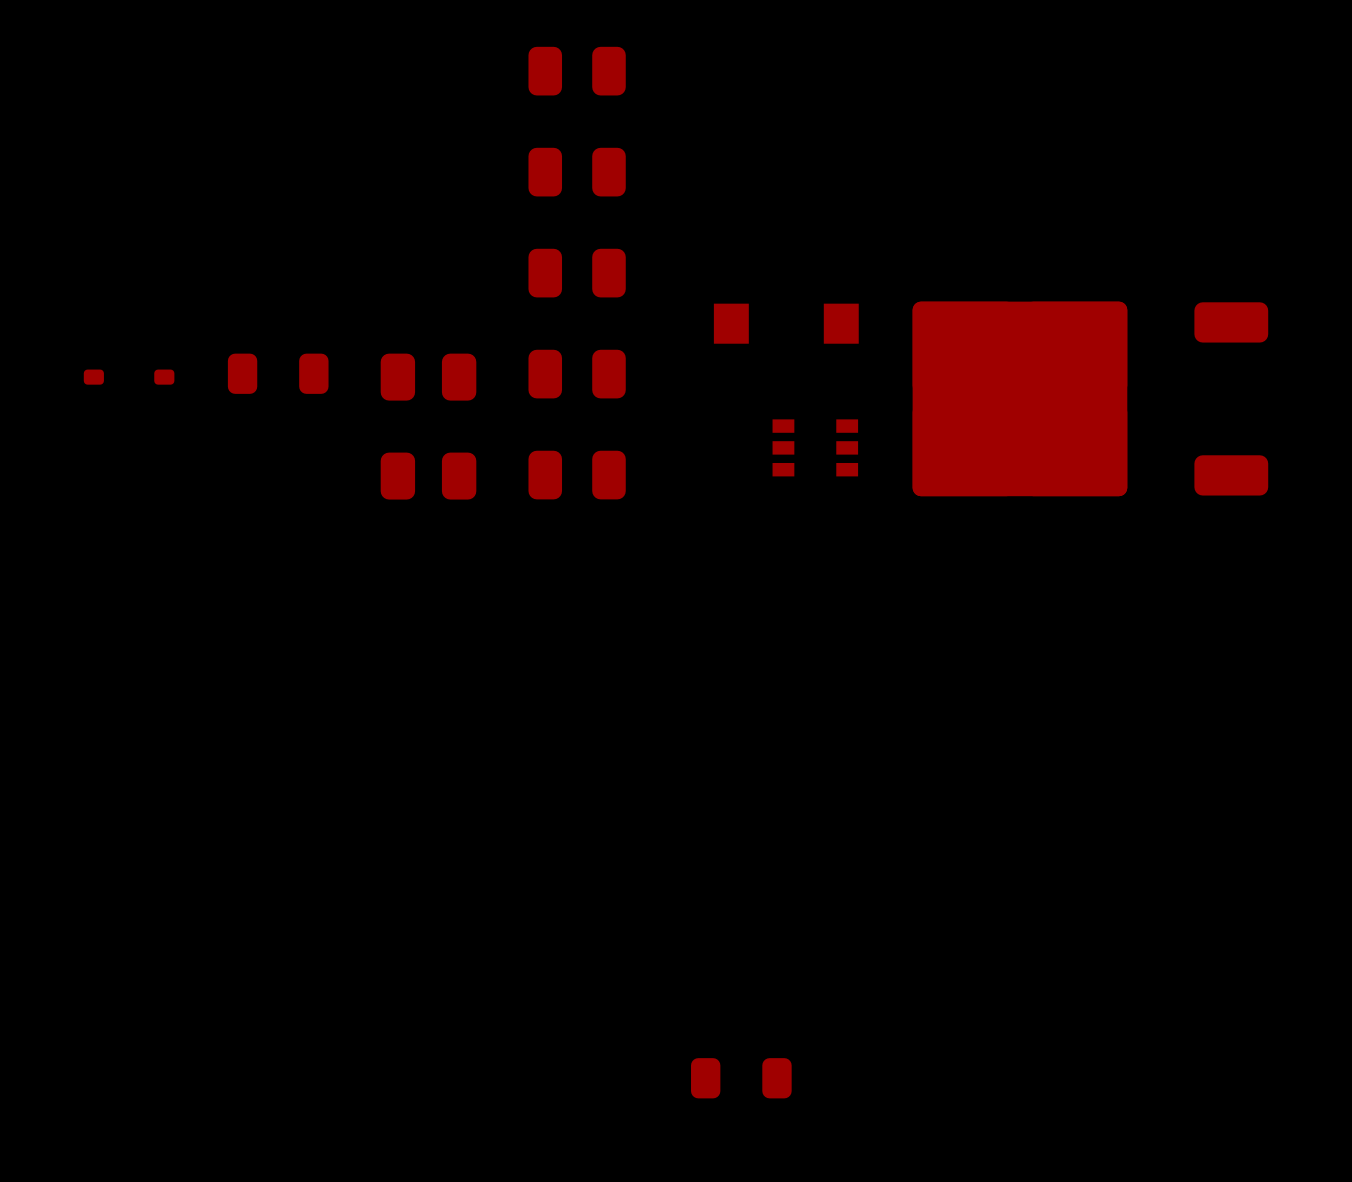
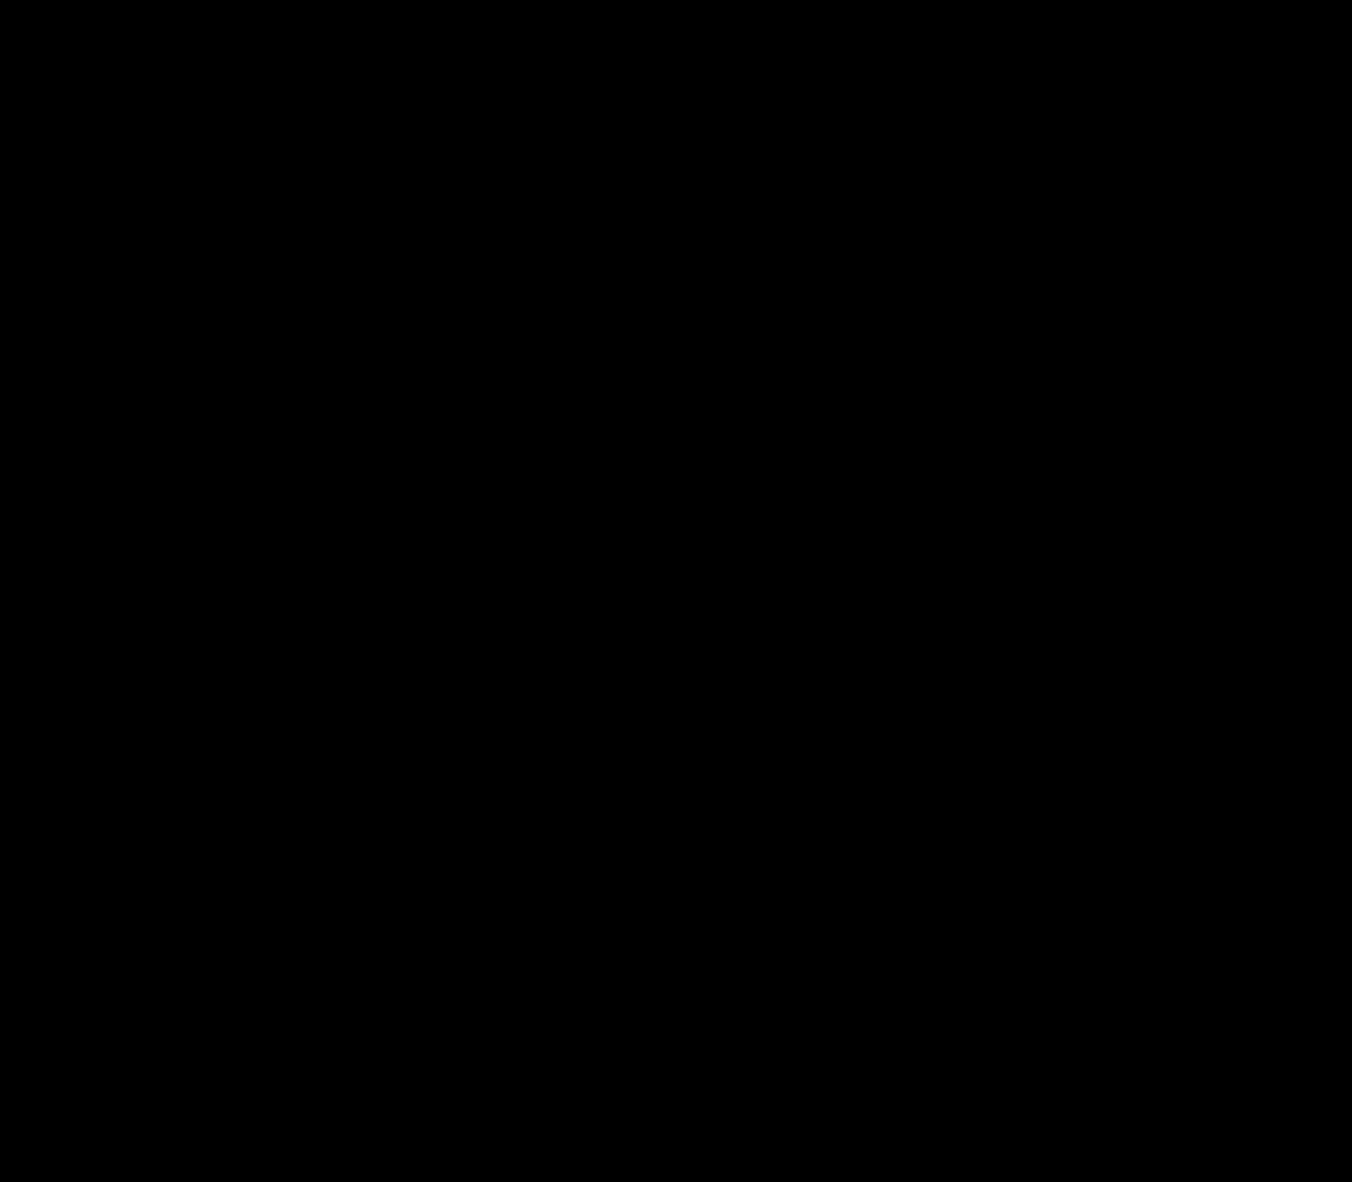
part: (577, 71) -> none
part: (577, 172) -> none
part: (577, 273) -> none
part: (786, 323) -> none
part: (278, 373) -> none
part: (577, 374) -> none
part: (129, 377) -> none
part: (428, 377) -> none
part: (1090, 398) -> none
part: (815, 447) -> none
part: (577, 475) -> none
part: (428, 476) -> none
part: (741, 1078) -> none

